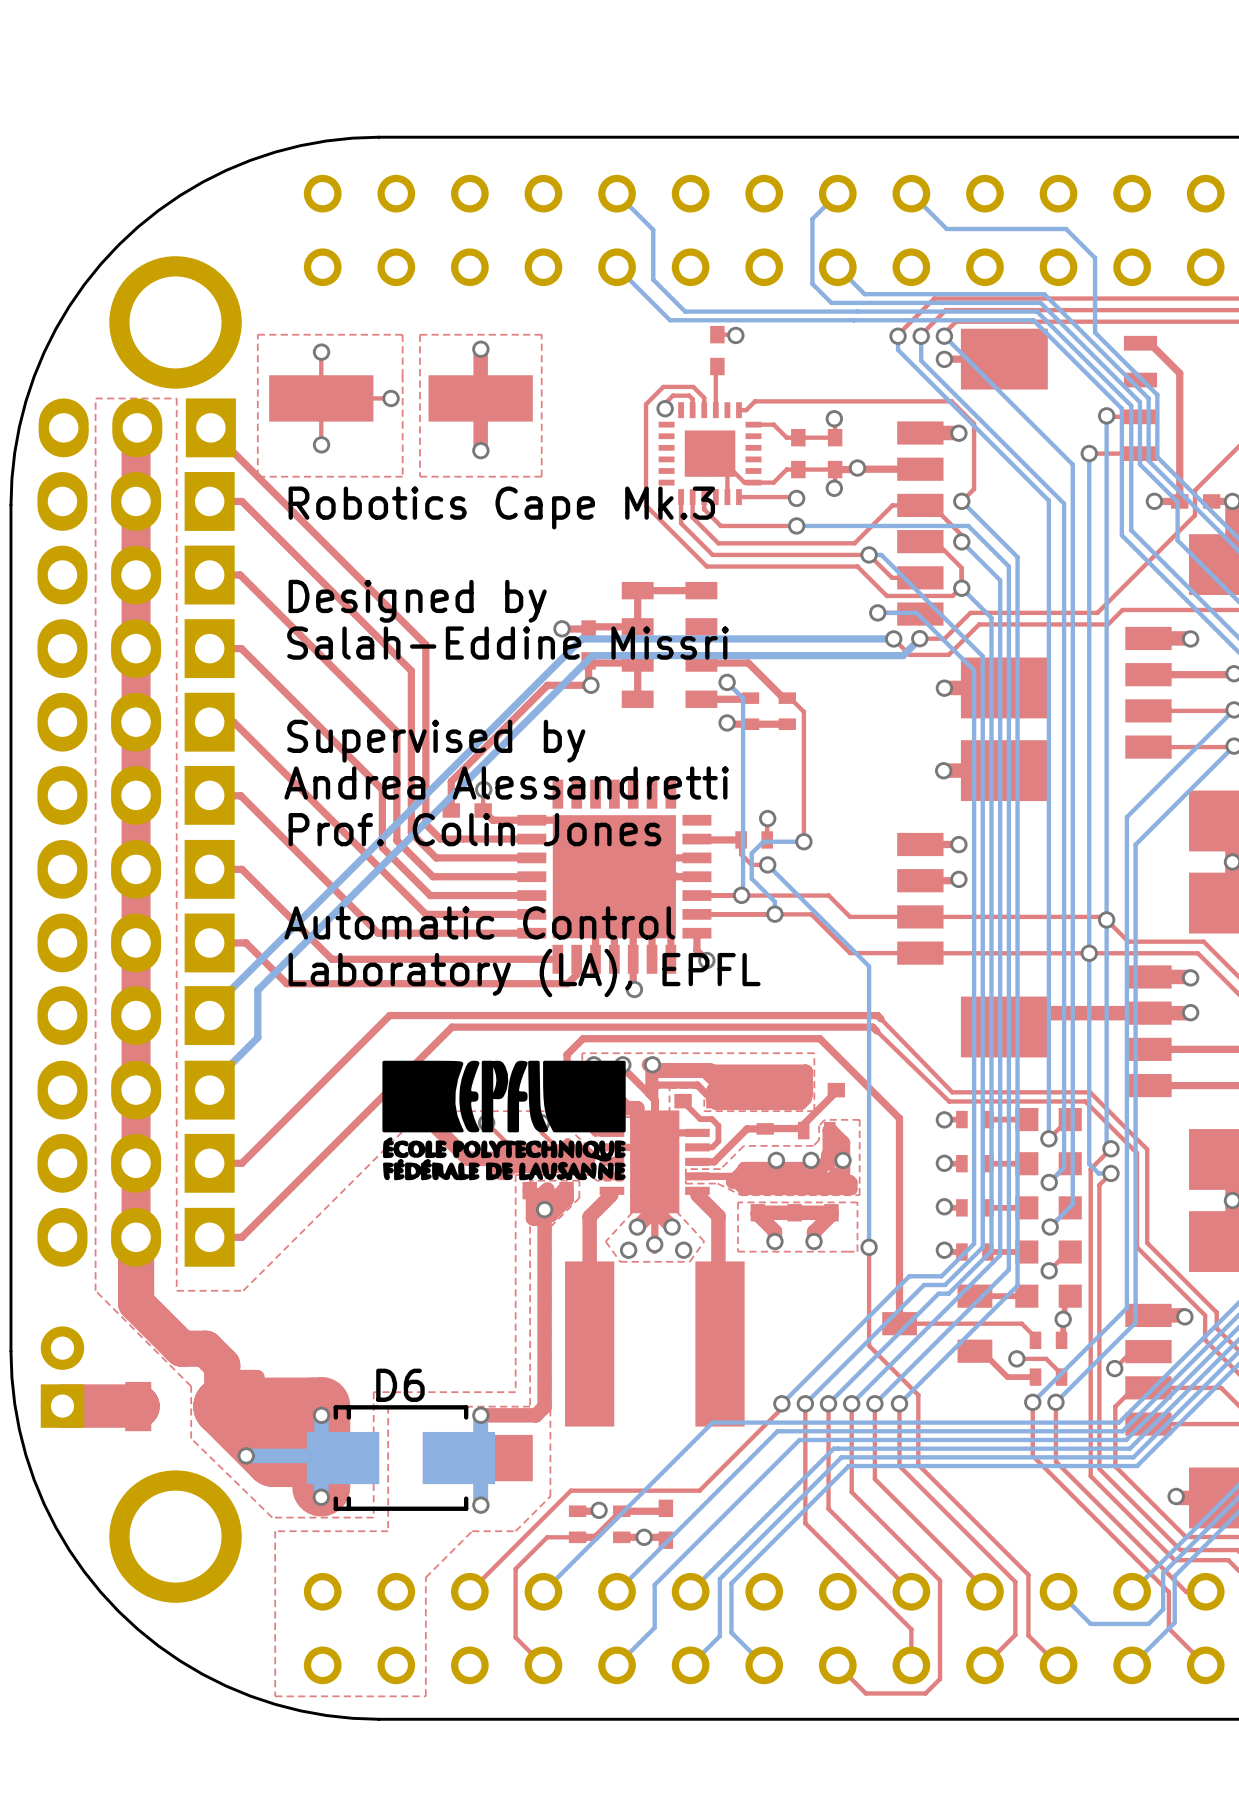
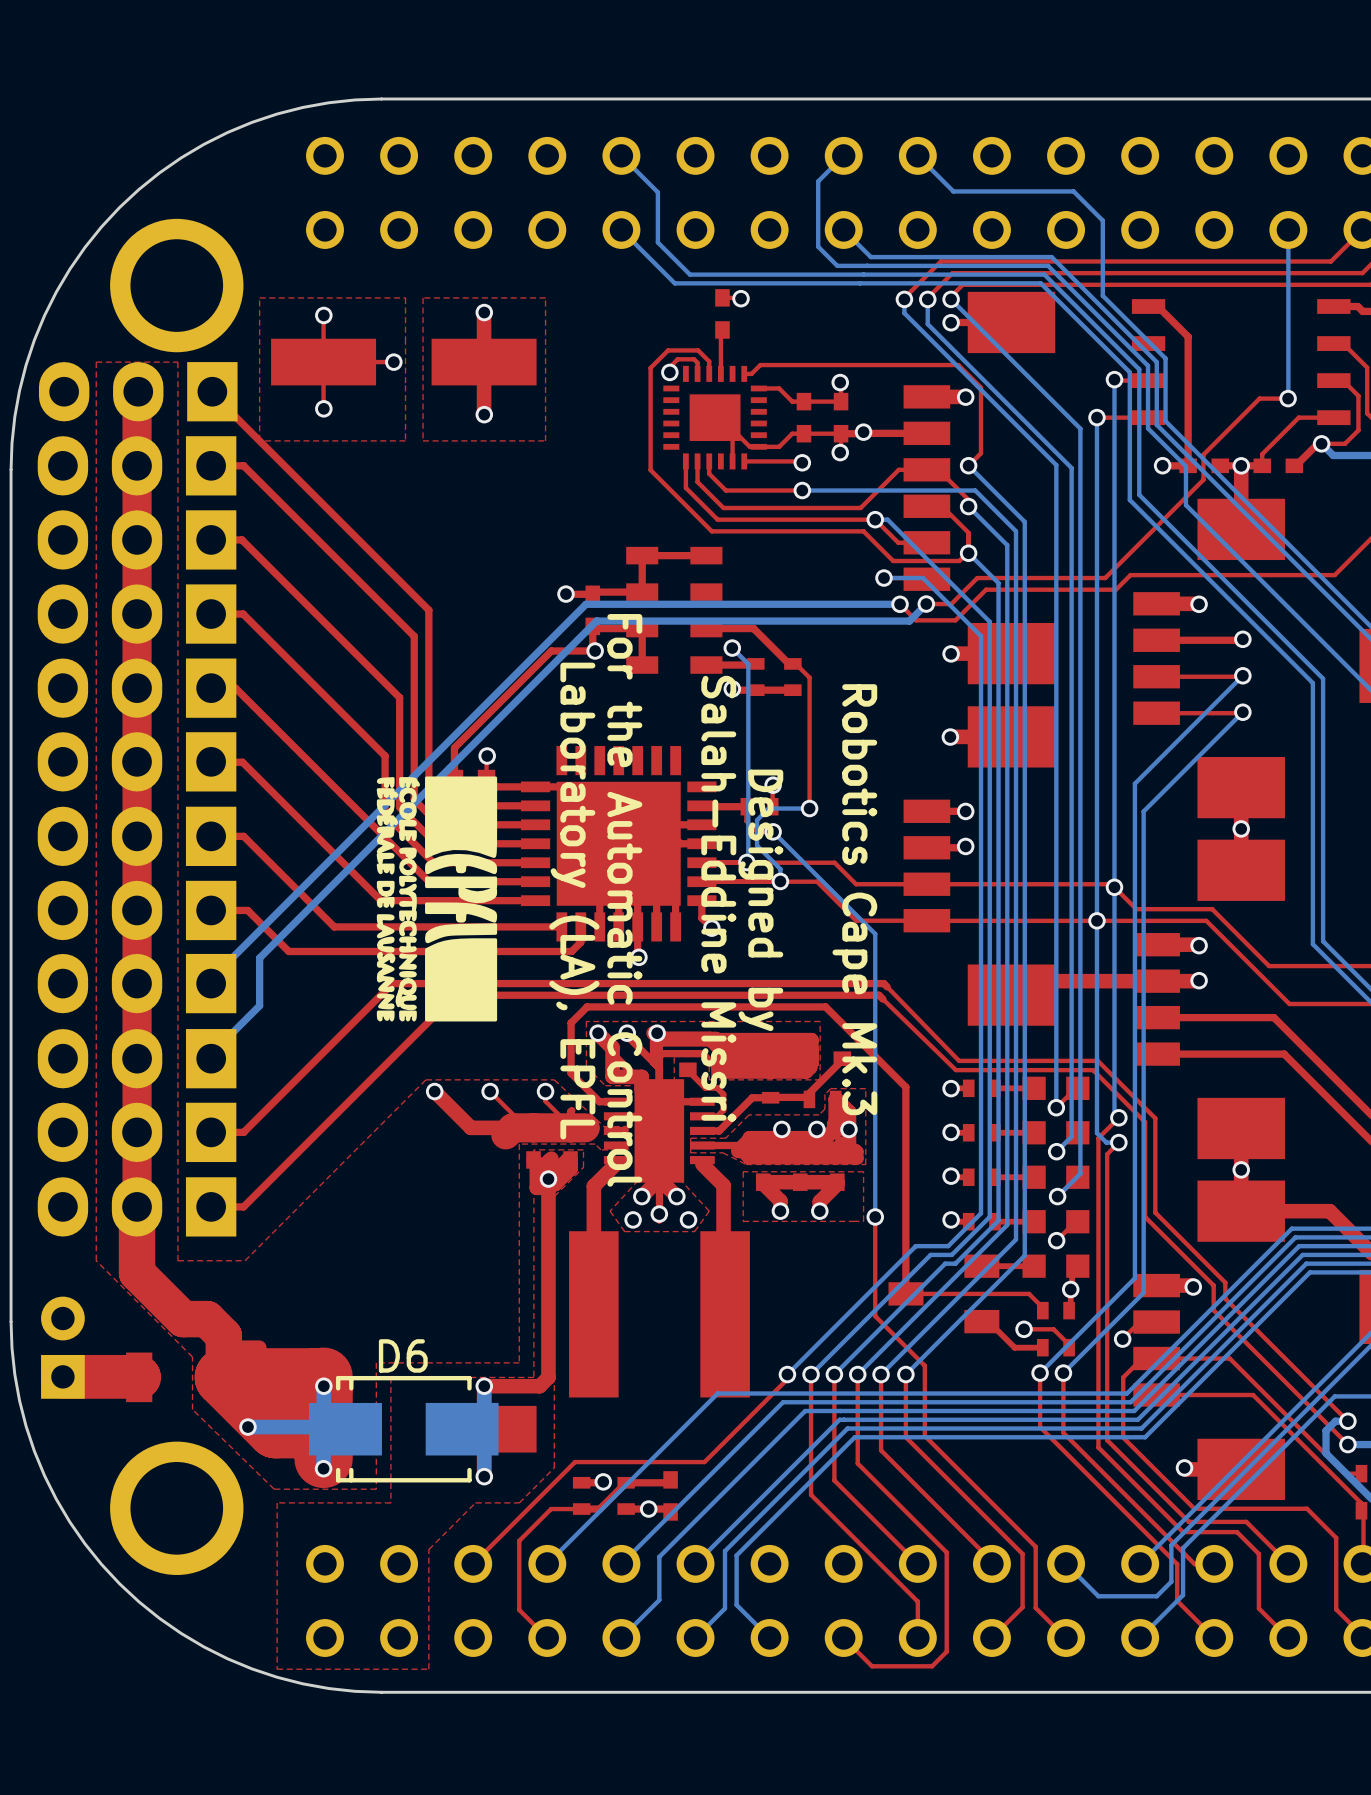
text rotation: 0° (501, 507) -> 90° clockwise (854, 899)
text position: Robotics Cape Mk.3 (501, 507) -> Robotics Cape Mk.3 (854, 899)
text rotation: 0° (417, 601) -> 90° clockwise (760, 900)
text position: Designed by (417, 601) -> Designed by (760, 900)
text rotation: 0° (508, 643) -> 90° clockwise (718, 898)
text: Supervised by (436, 741) -> none
text: Andrea Alessandretti (506, 783) -> none
drawing: none -> [376, 776, 498, 1022]
text: Prof. Colin Jones (474, 829) -> none
text: Automatic Control (479, 922) -> For the Automatic Control (624, 900)
text rotation: 0° (524, 973) -> 90° clockwise (574, 901)
drawing: [382, 1060, 626, 1181] -> none

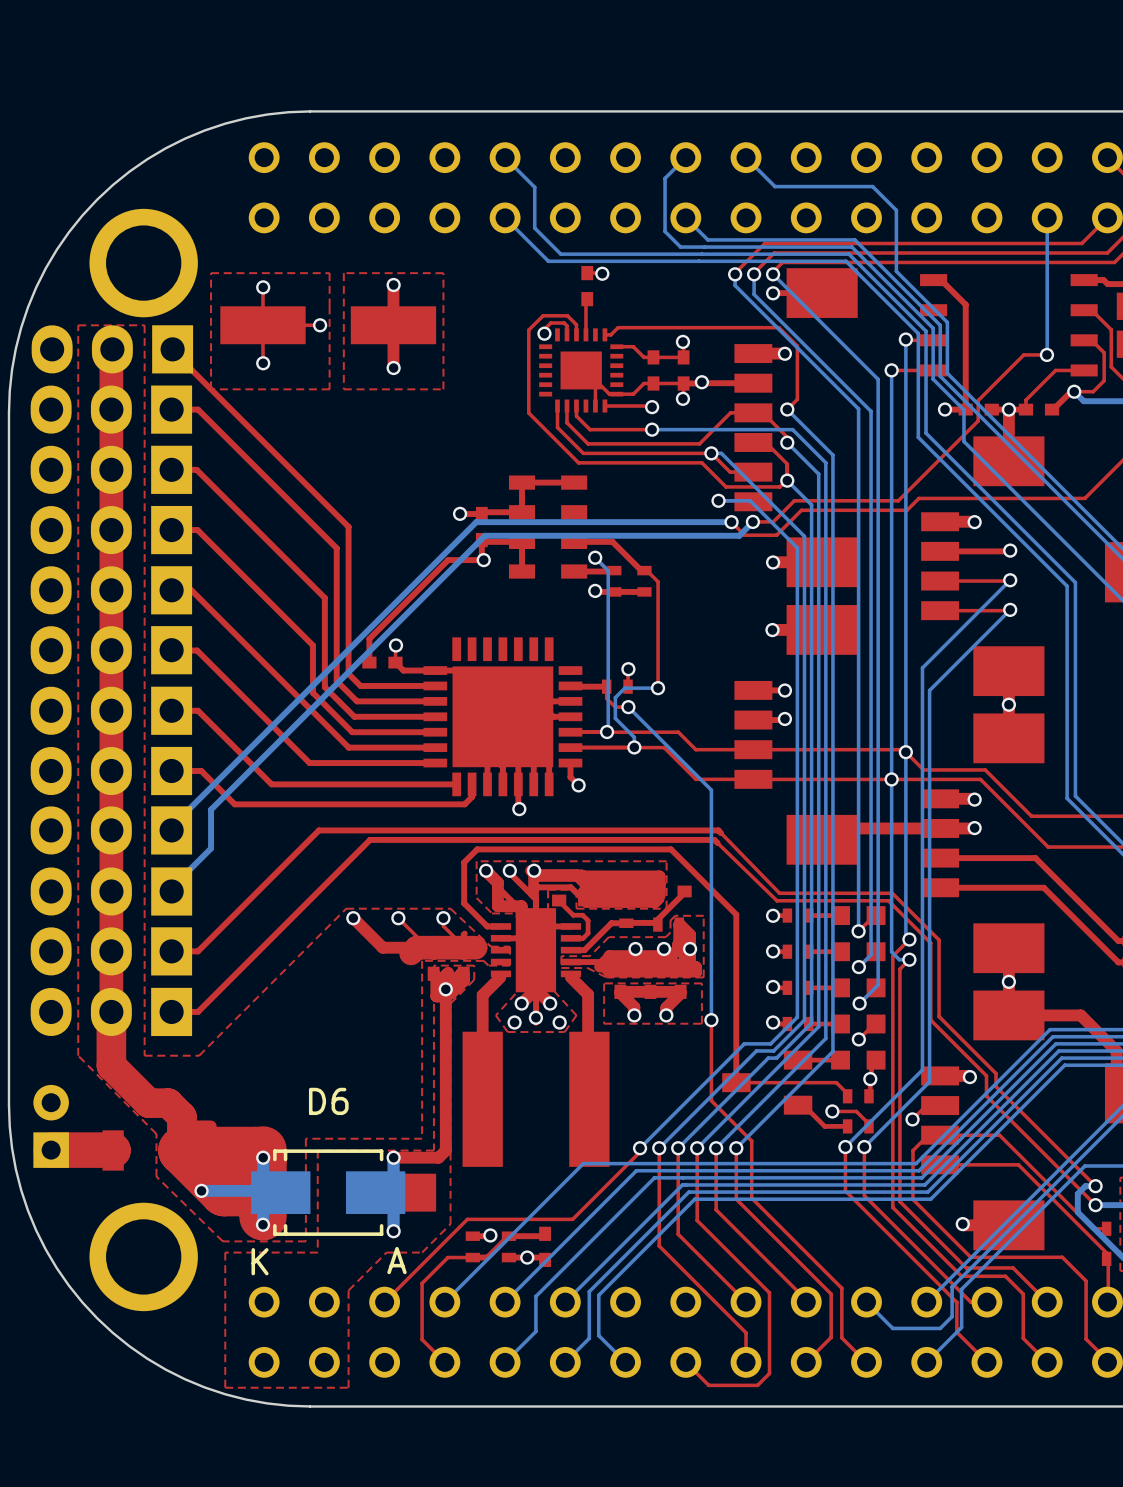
drawing: [376, 776, 498, 1022] -> none
text: Salah-Eddine Missri (718, 898) -> none
text: Robotics Cape Mk.3 (854, 899) -> none
text: For the Automatic Control (624, 900) -> none
text: Designed by (760, 900) -> none
text: Laboratory (LA), EPFL (574, 901) -> none
D6 name position: D6 (403, 1355) -> D6 (328, 1101)
D6 text: none -> A (397, 1260)
D6 text: none -> K (260, 1261)

